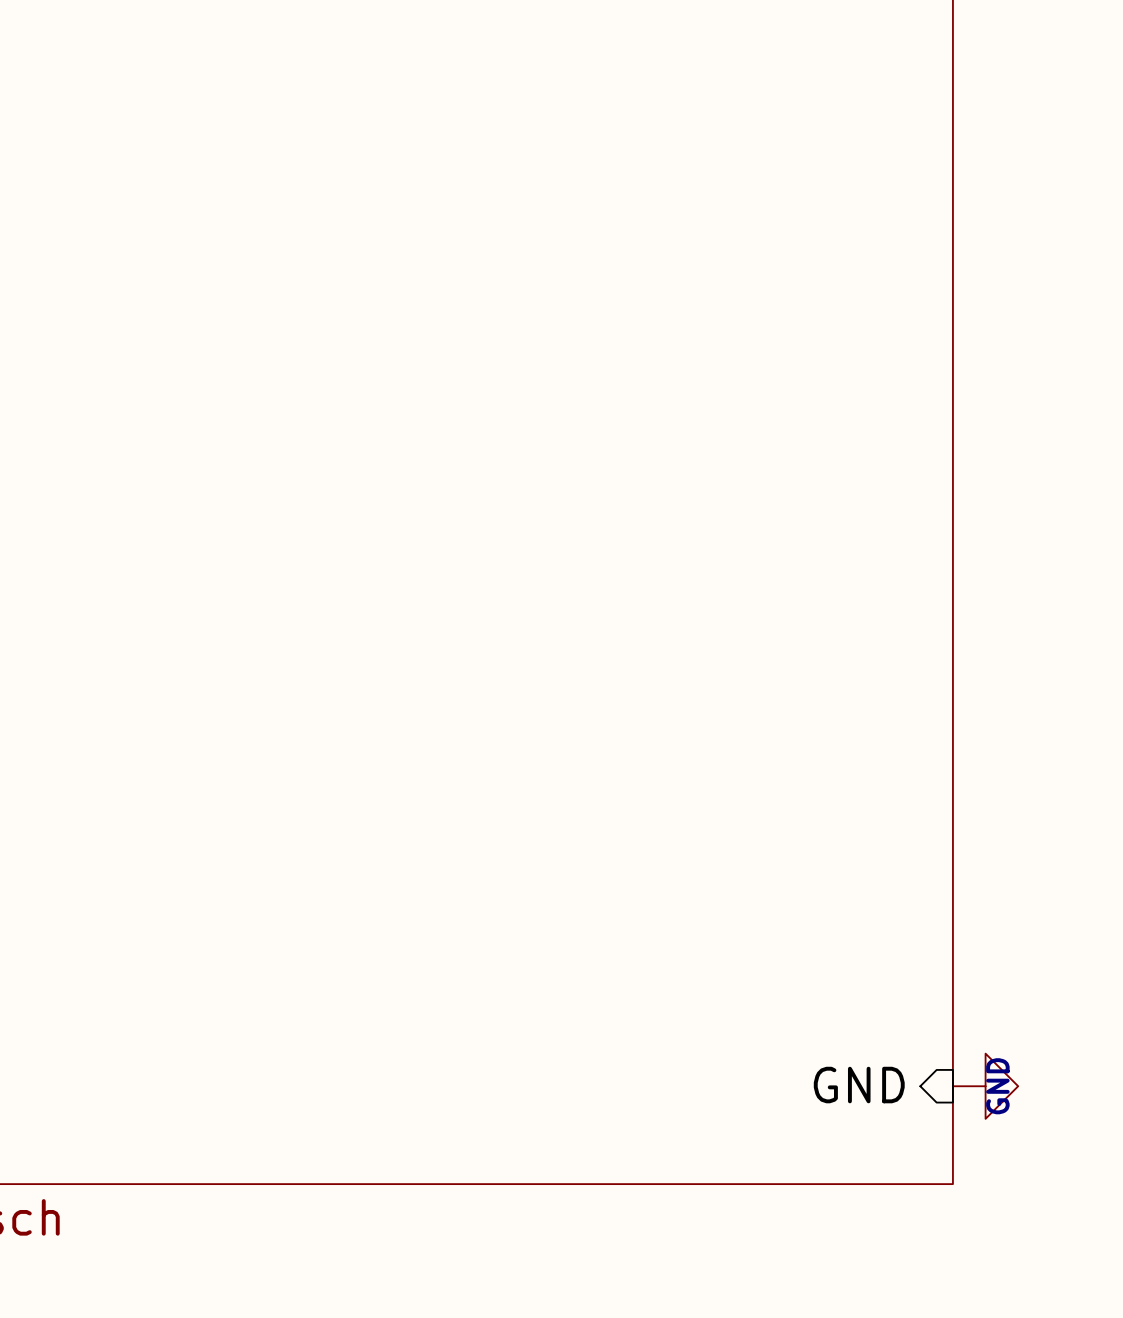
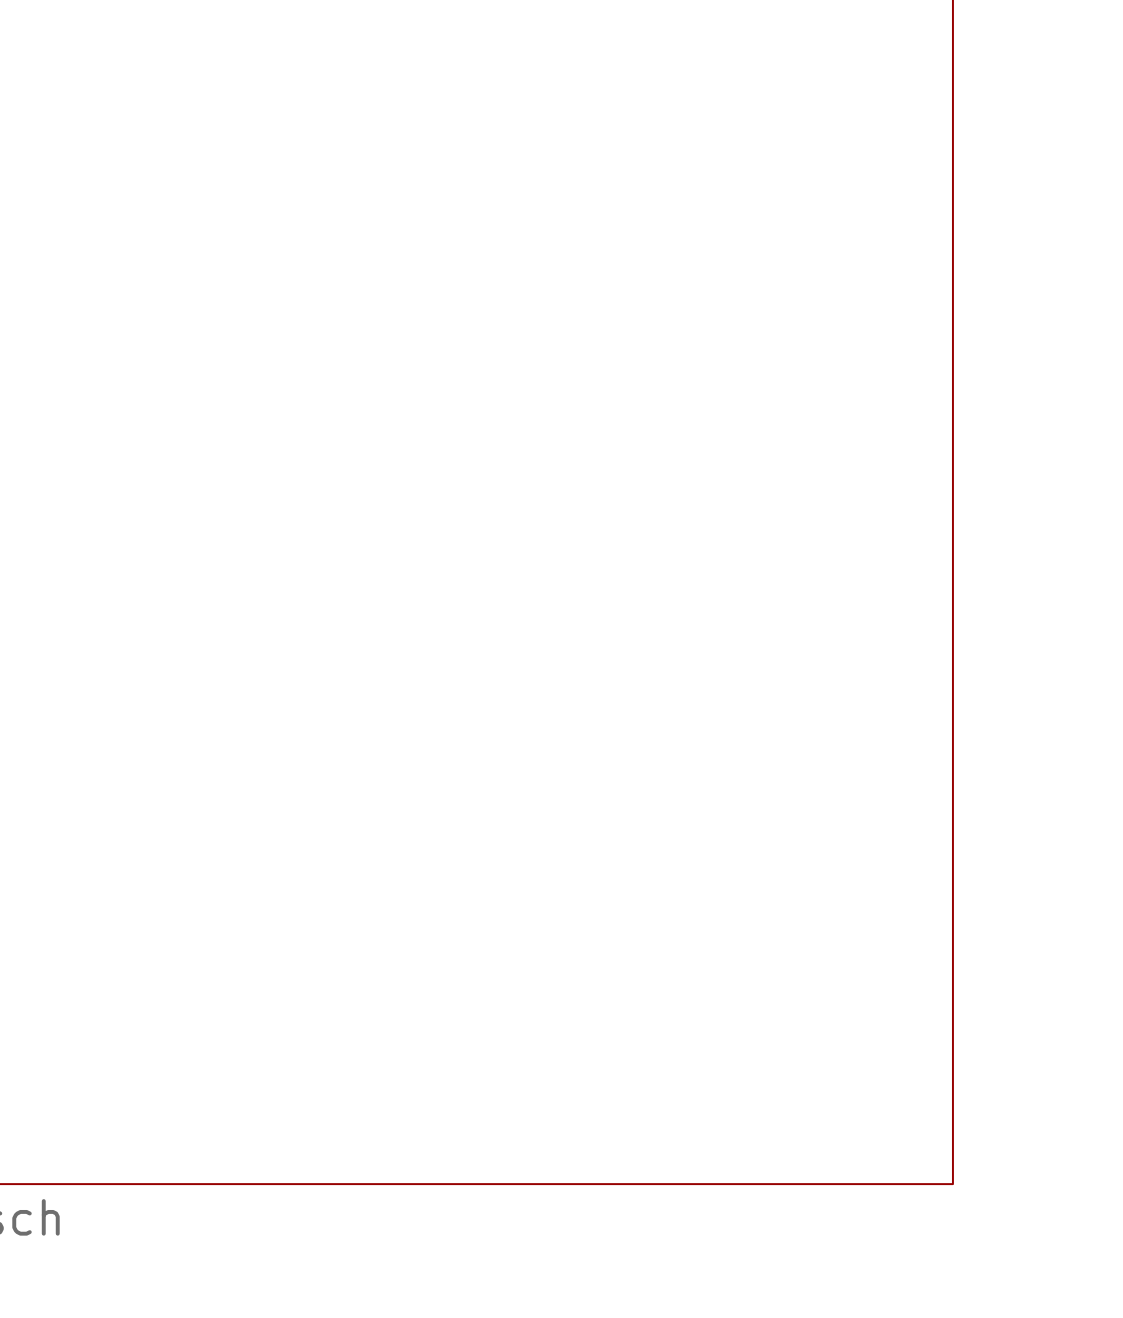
sheet pin: GND (859, 1085) -> none
power symbol: GND (985, 1086) -> none

